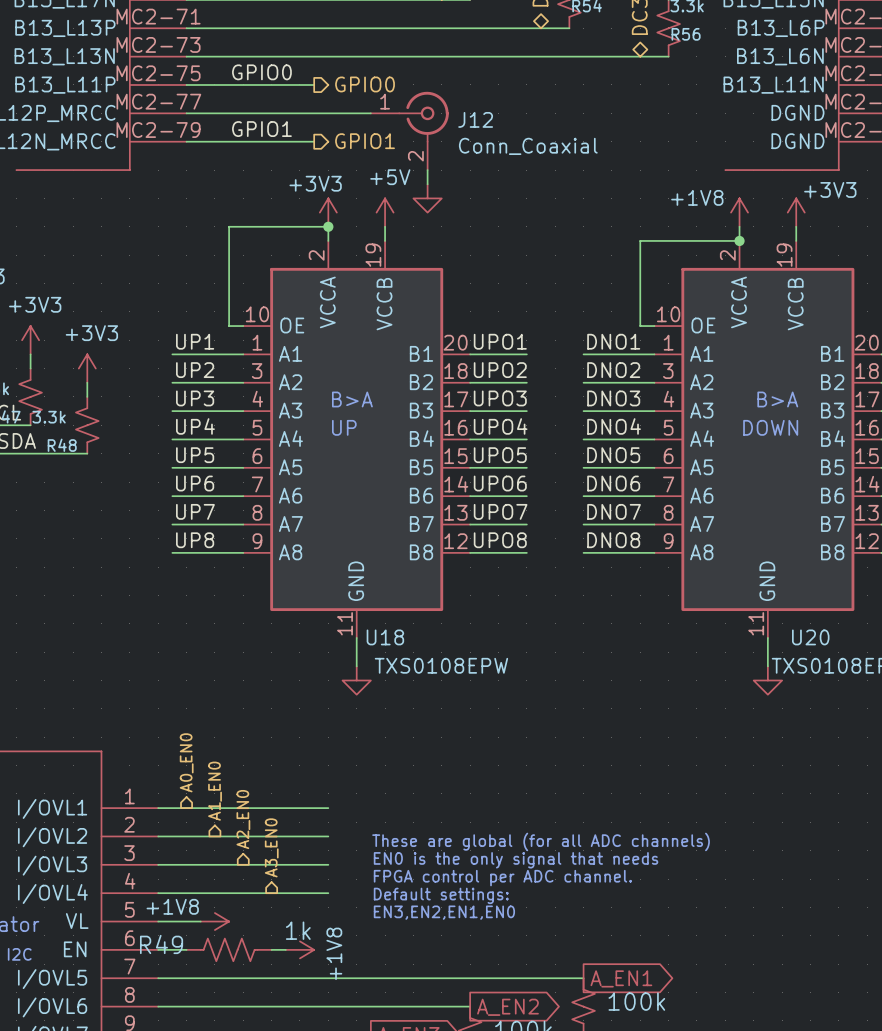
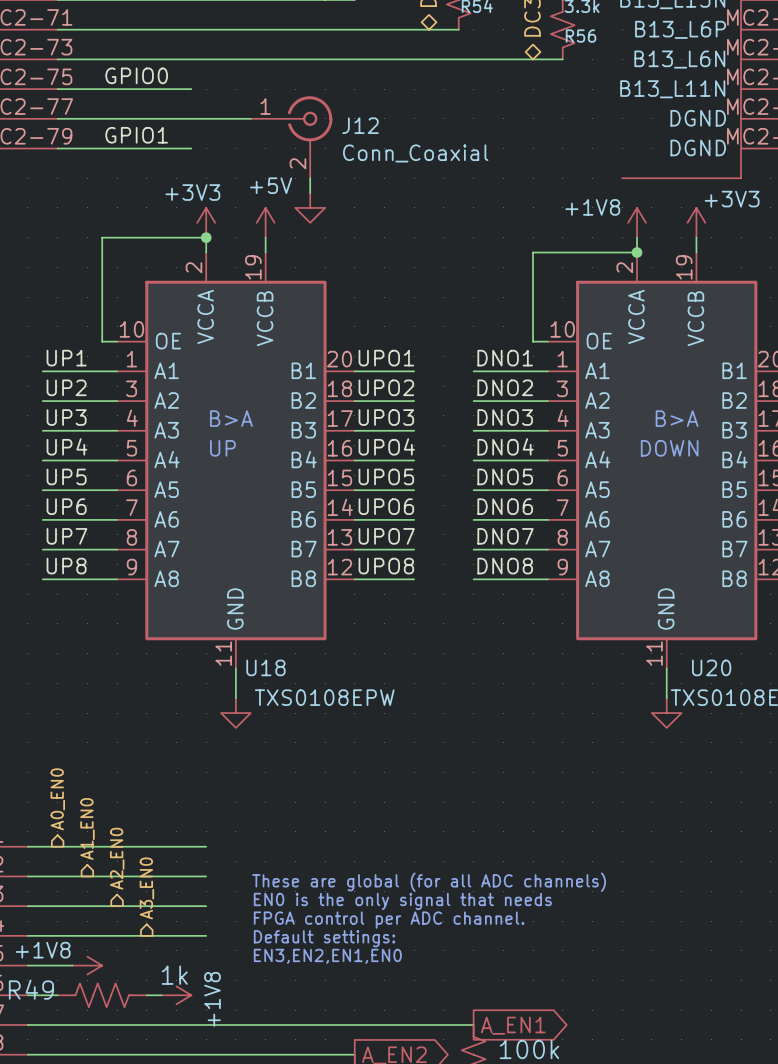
hierarchical label: GPIO0 (365, 84) -> none
hierarchical label: GPIO1 (365, 141) -> none

